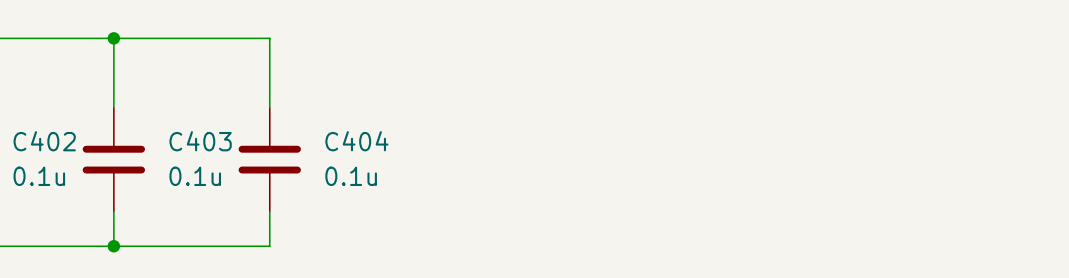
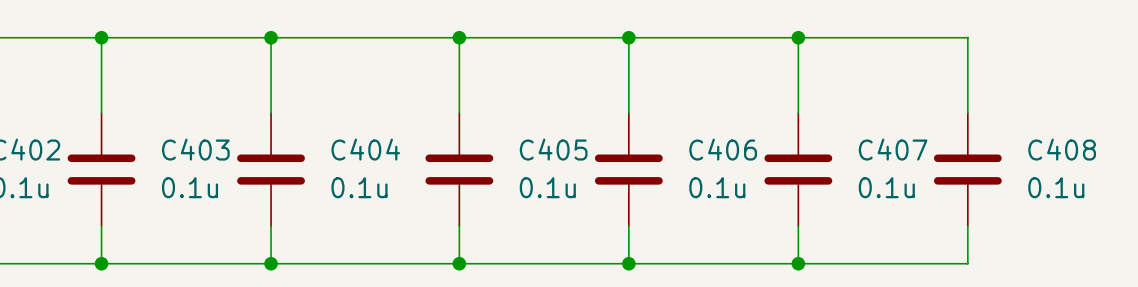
wire: none -> (271, 37) (967, 37) (967, 113)
junction: none -> (271, 37)
wire: none -> (459, 37) (459, 113)
junction: none -> (459, 37)
wire: none -> (628, 37) (628, 113)
junction: none -> (628, 37)
wire: none -> (798, 37) (798, 113)
junction: none -> (798, 37)
C405: none -> 0.1u (459, 169)
C406: none -> 0.1u (628, 169)
C407: none -> 0.1u (798, 169)
C408: none -> 0.1u (967, 169)
wire: none -> (459, 226) (459, 263)
wire: none -> (628, 226) (628, 263)
wire: none -> (798, 226) (798, 263)
wire: none -> (967, 226) (967, 263) (271, 263)
junction: none -> (271, 263)
junction: none -> (459, 263)
junction: none -> (628, 263)
junction: none -> (798, 263)

